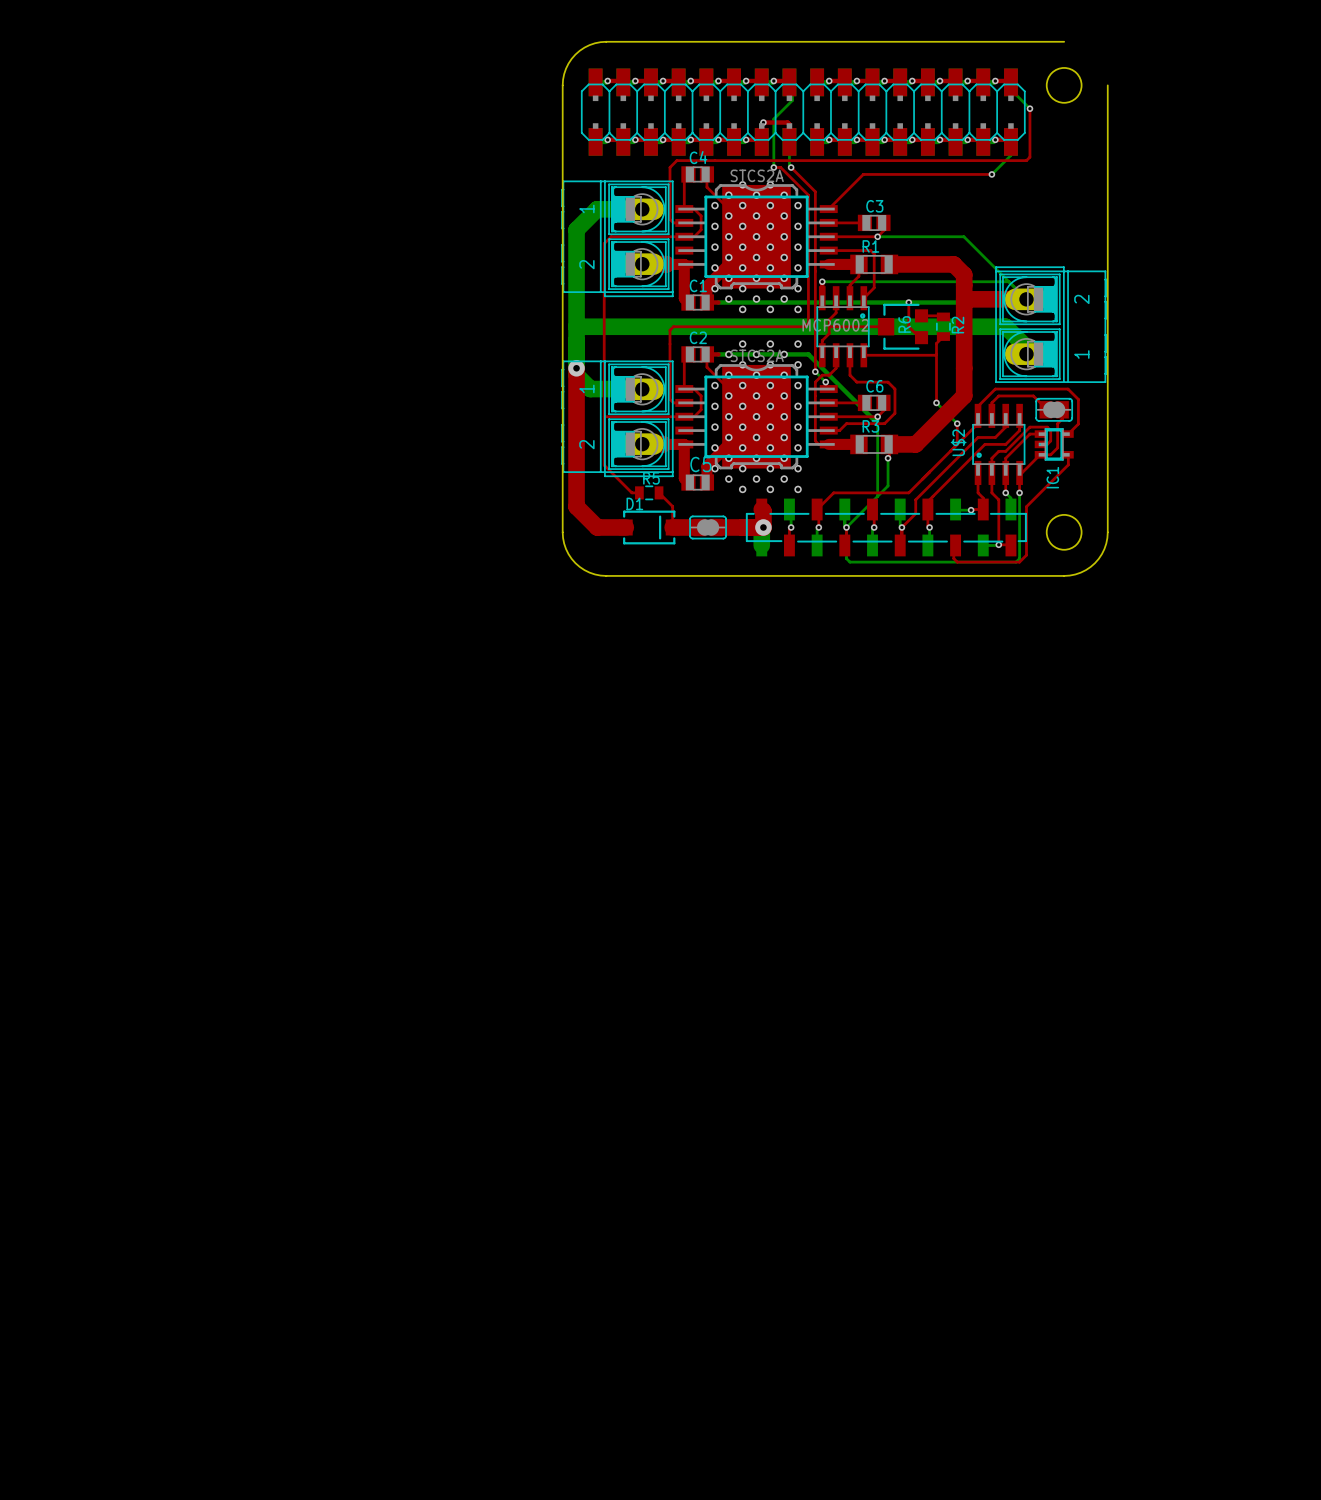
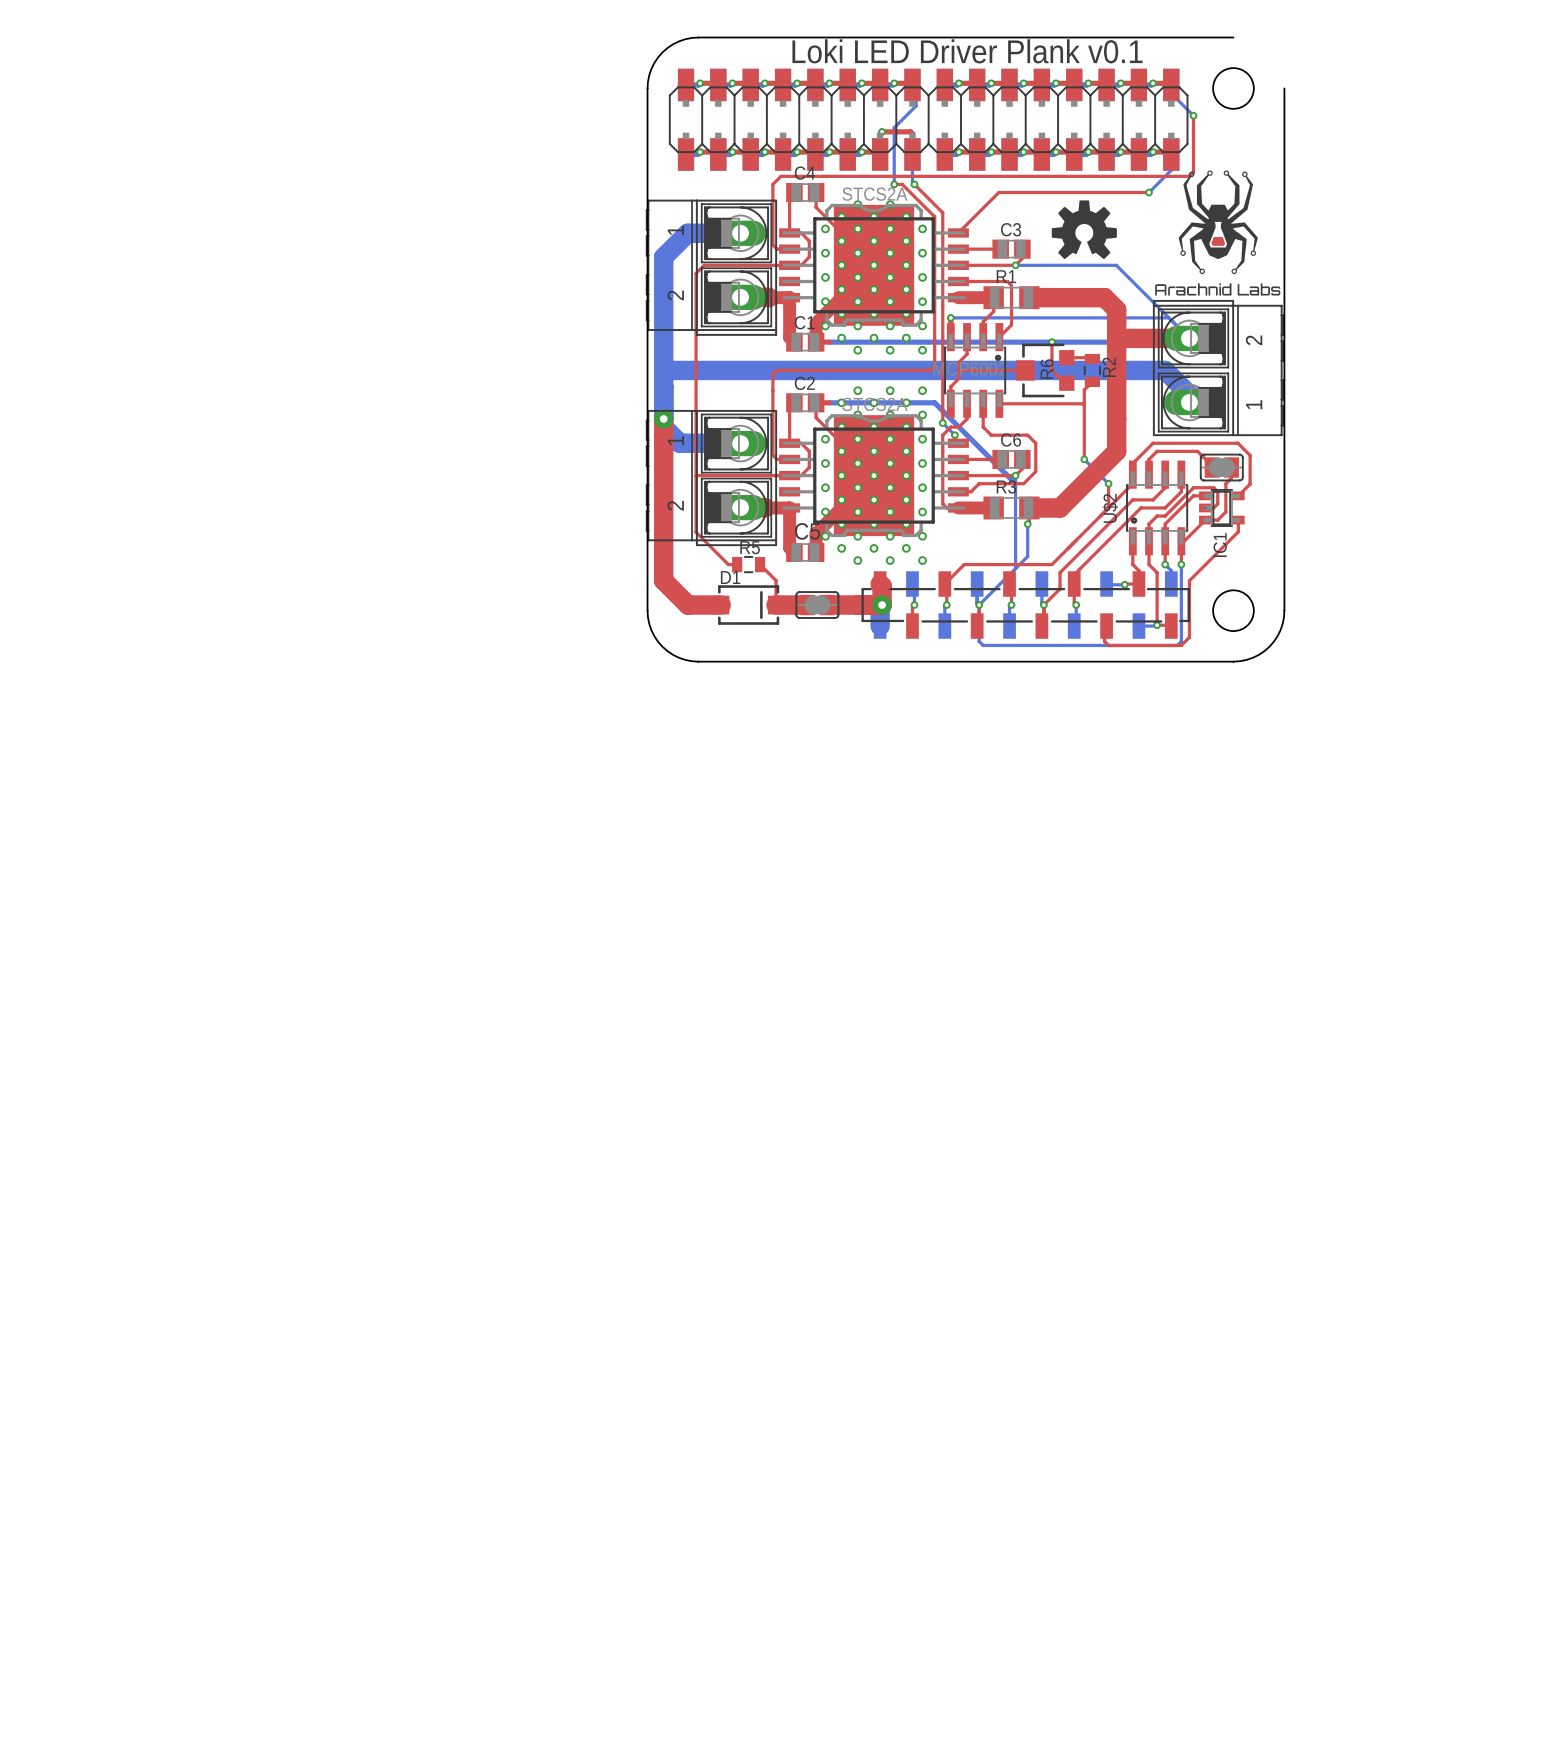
text: none -> Loki LED Driver Plank v0.1 (967, 51)
drawing: none -> [1155, 170, 1281, 296]
drawing: none -> [1051, 200, 1117, 260]

